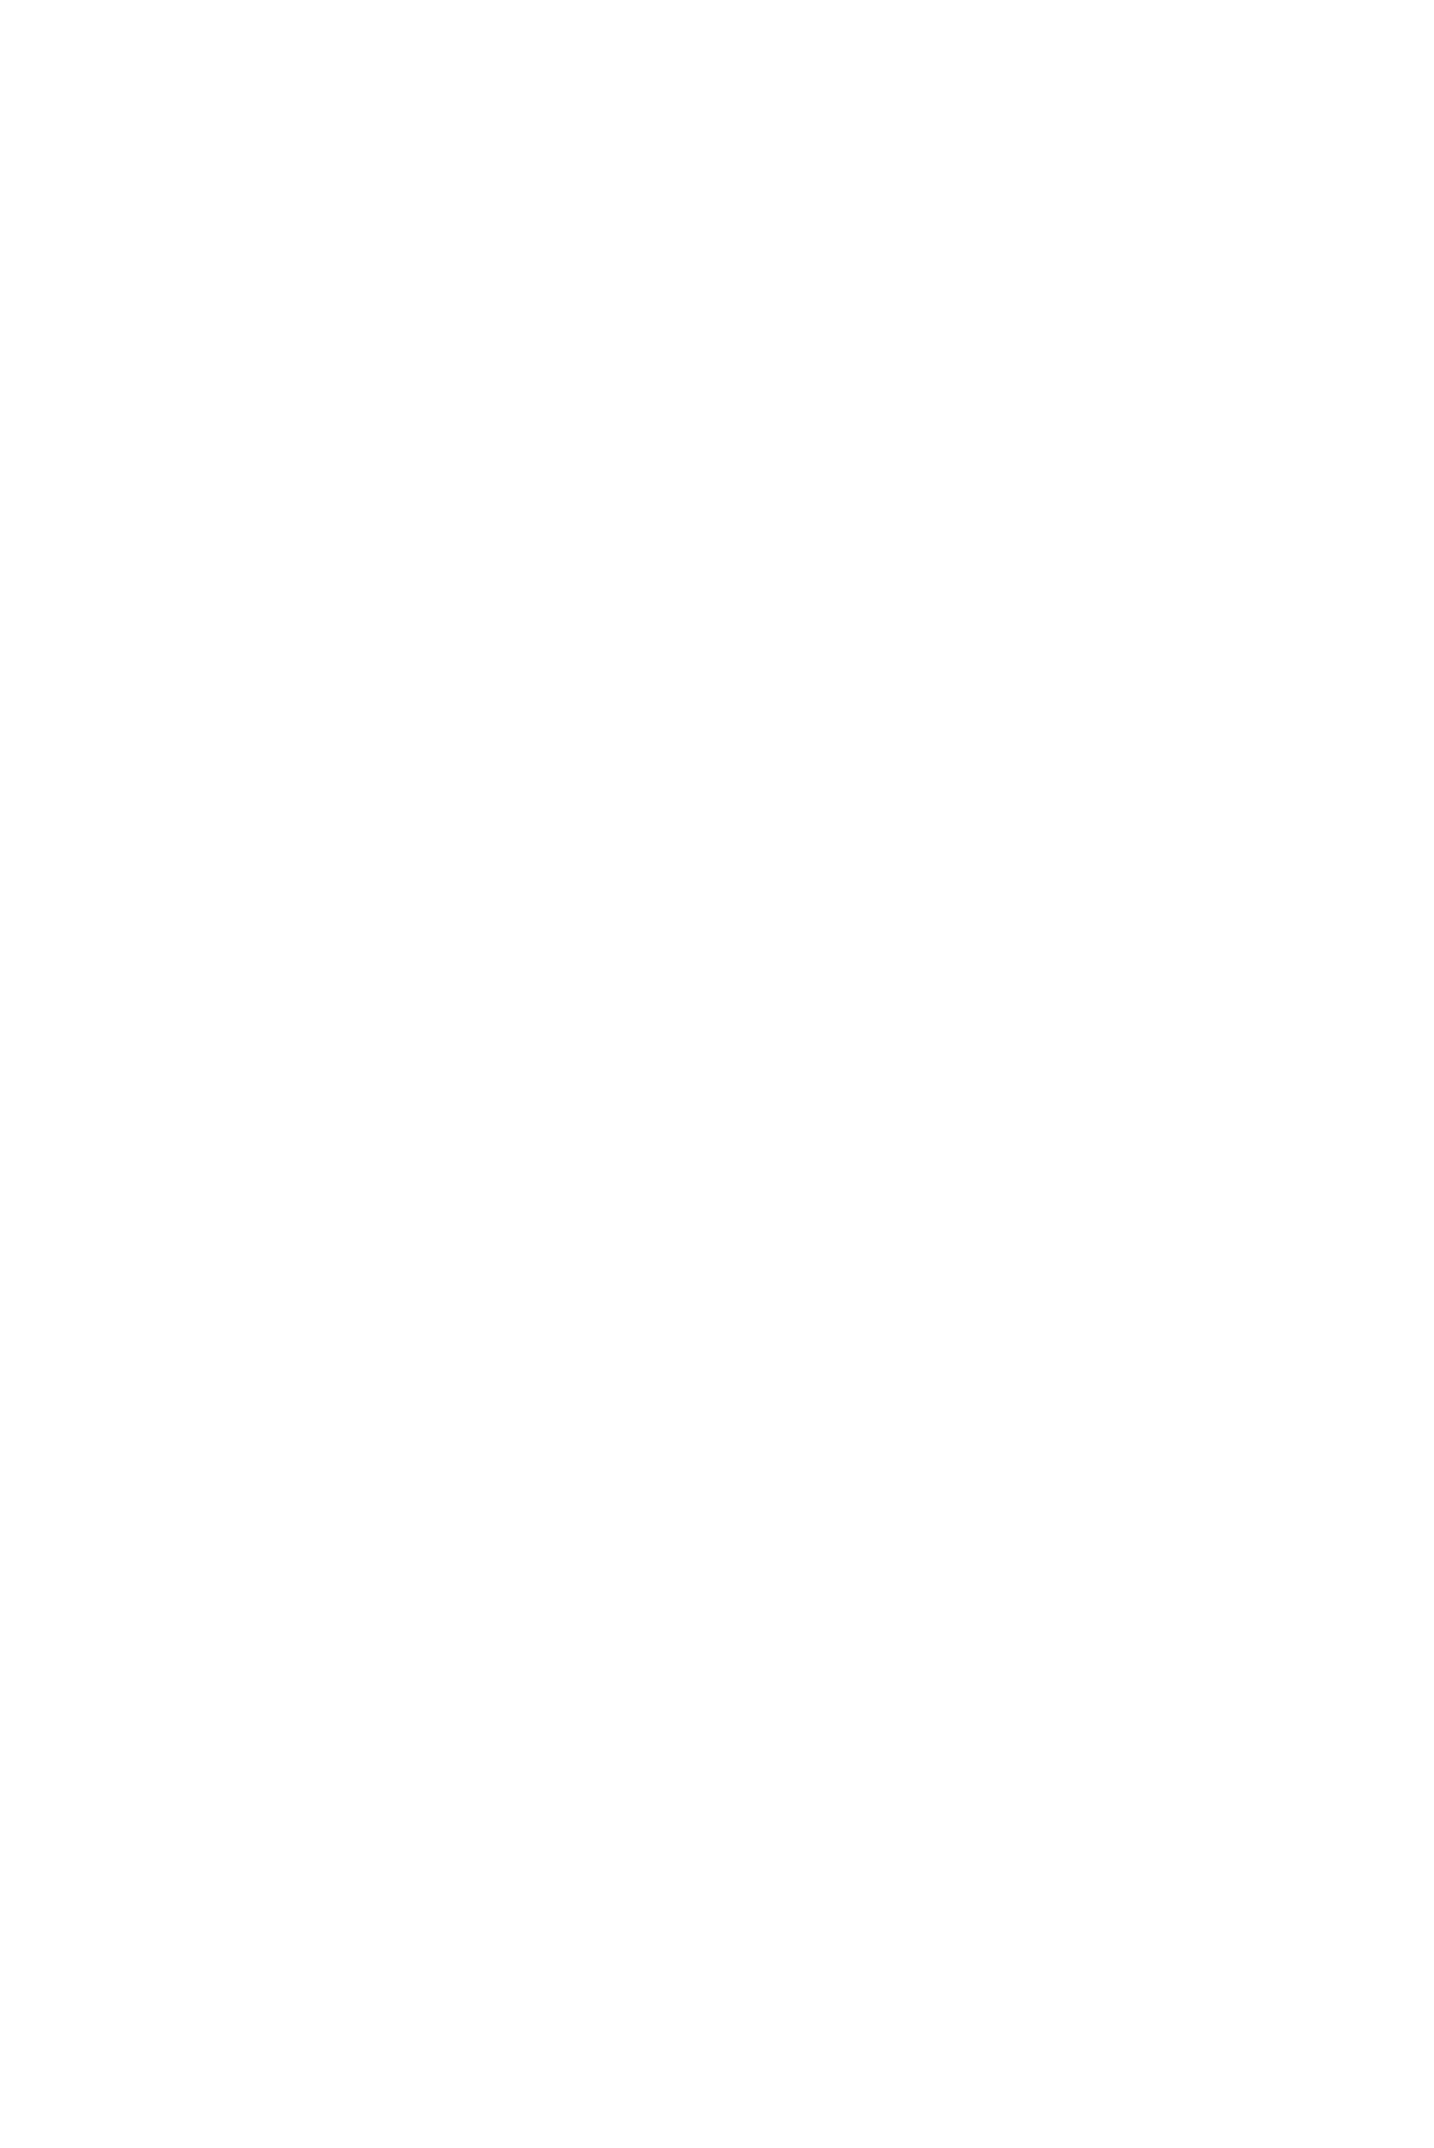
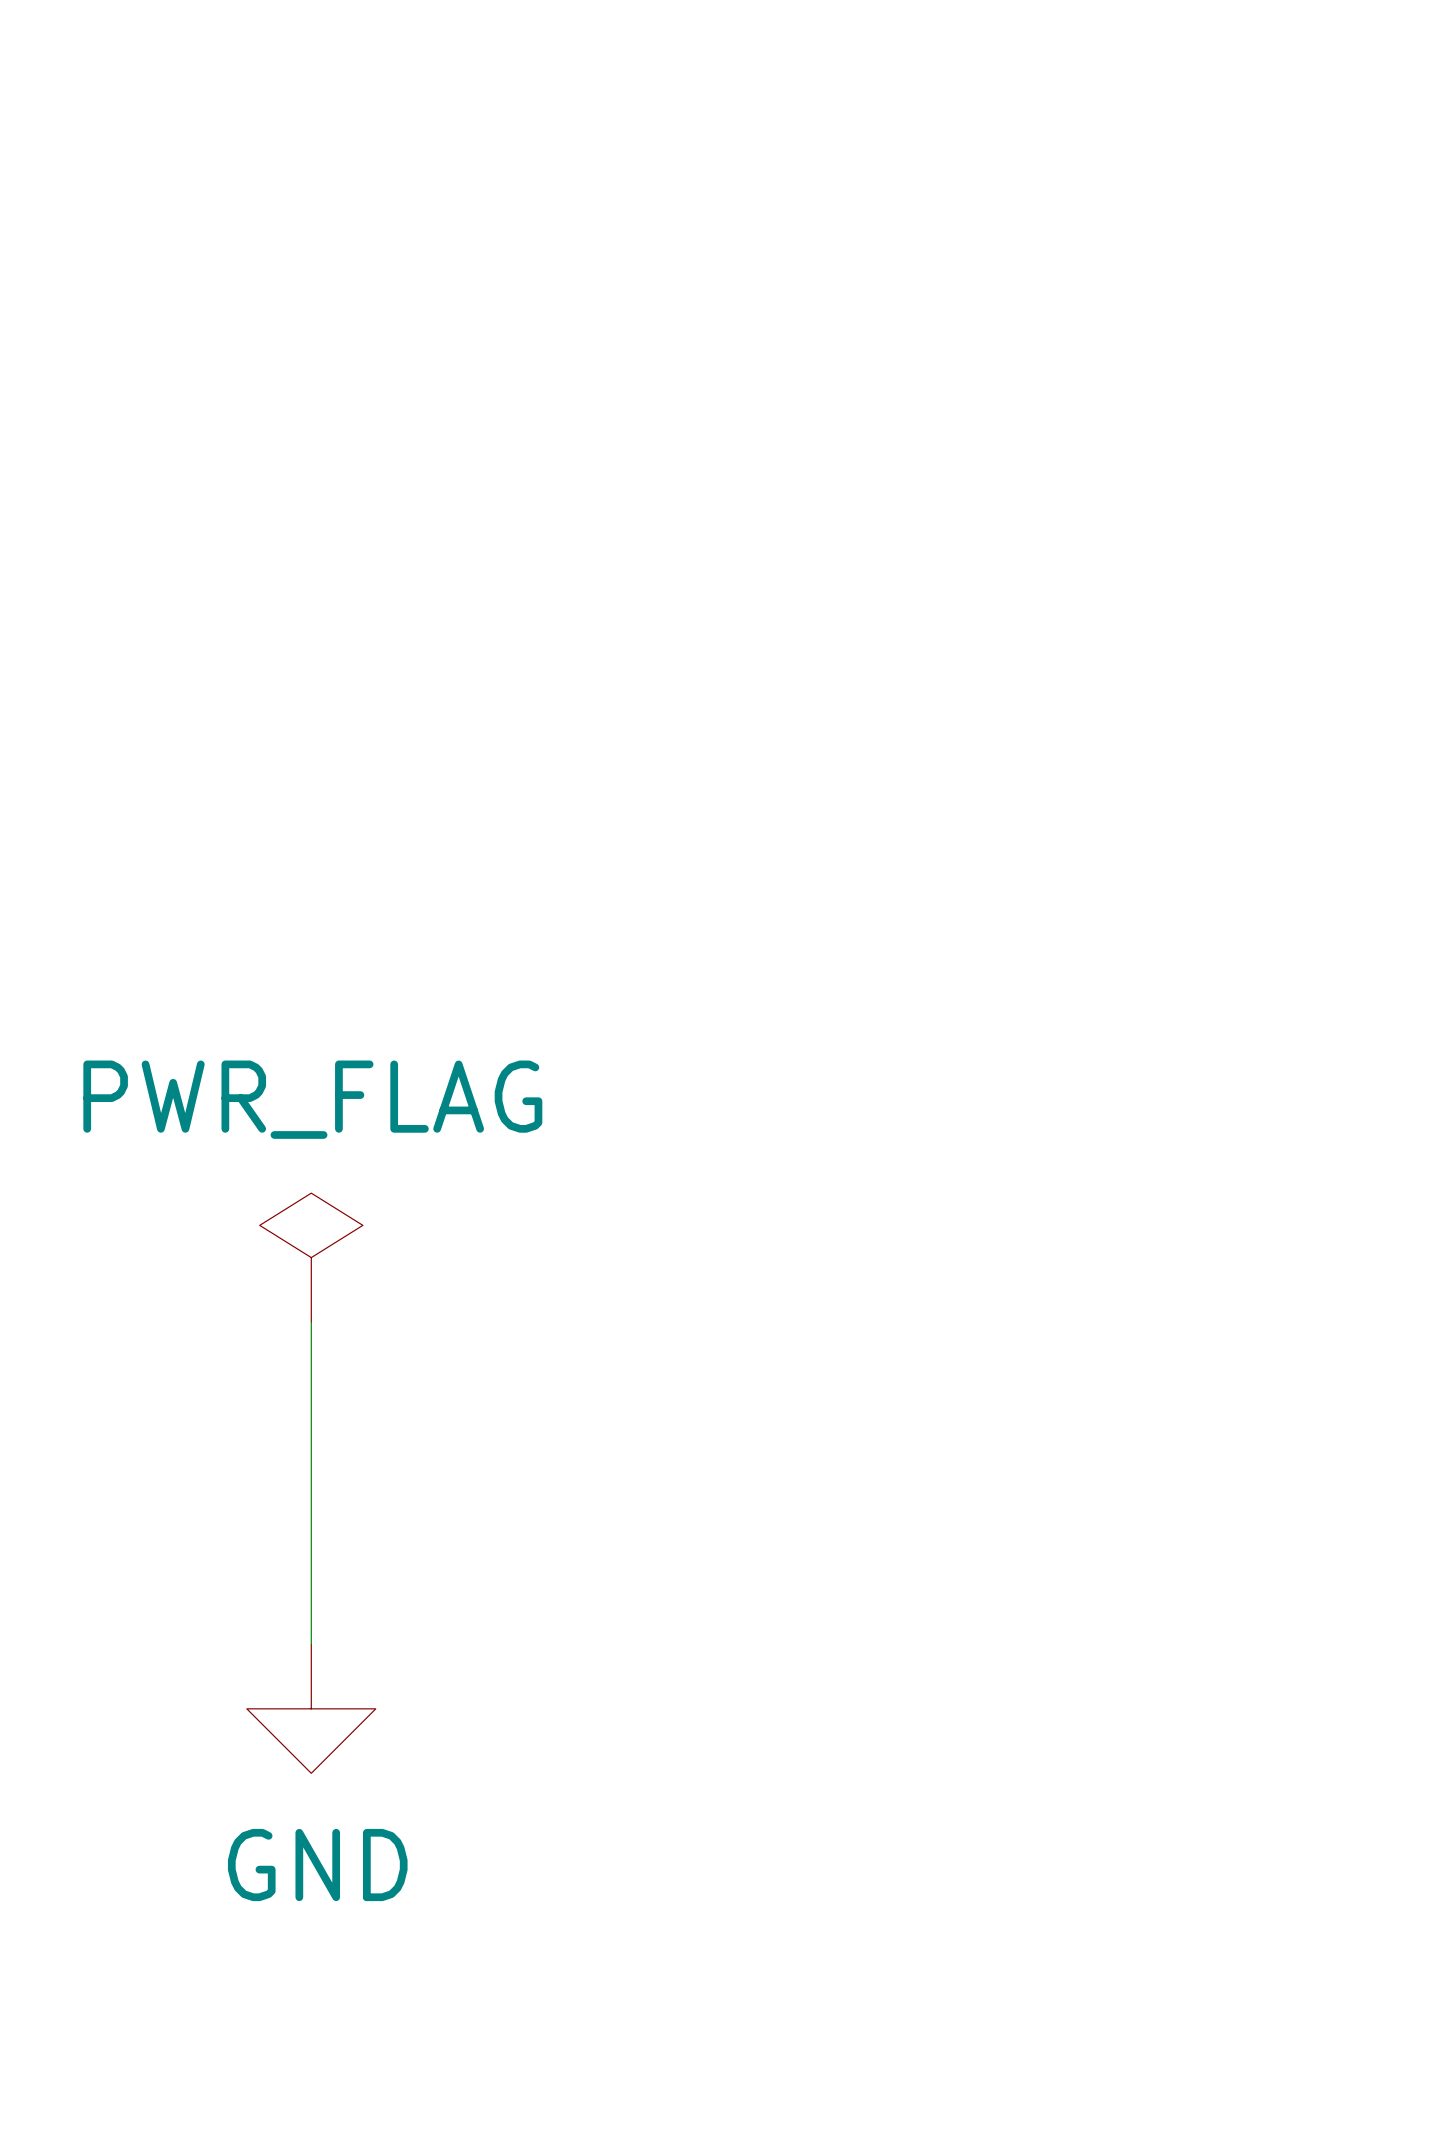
power symbol: none -> PWR_FLAG (311, 1257)
wire: none -> (311, 1322) (311, 1644)
power symbol: none -> GND (311, 1708)

